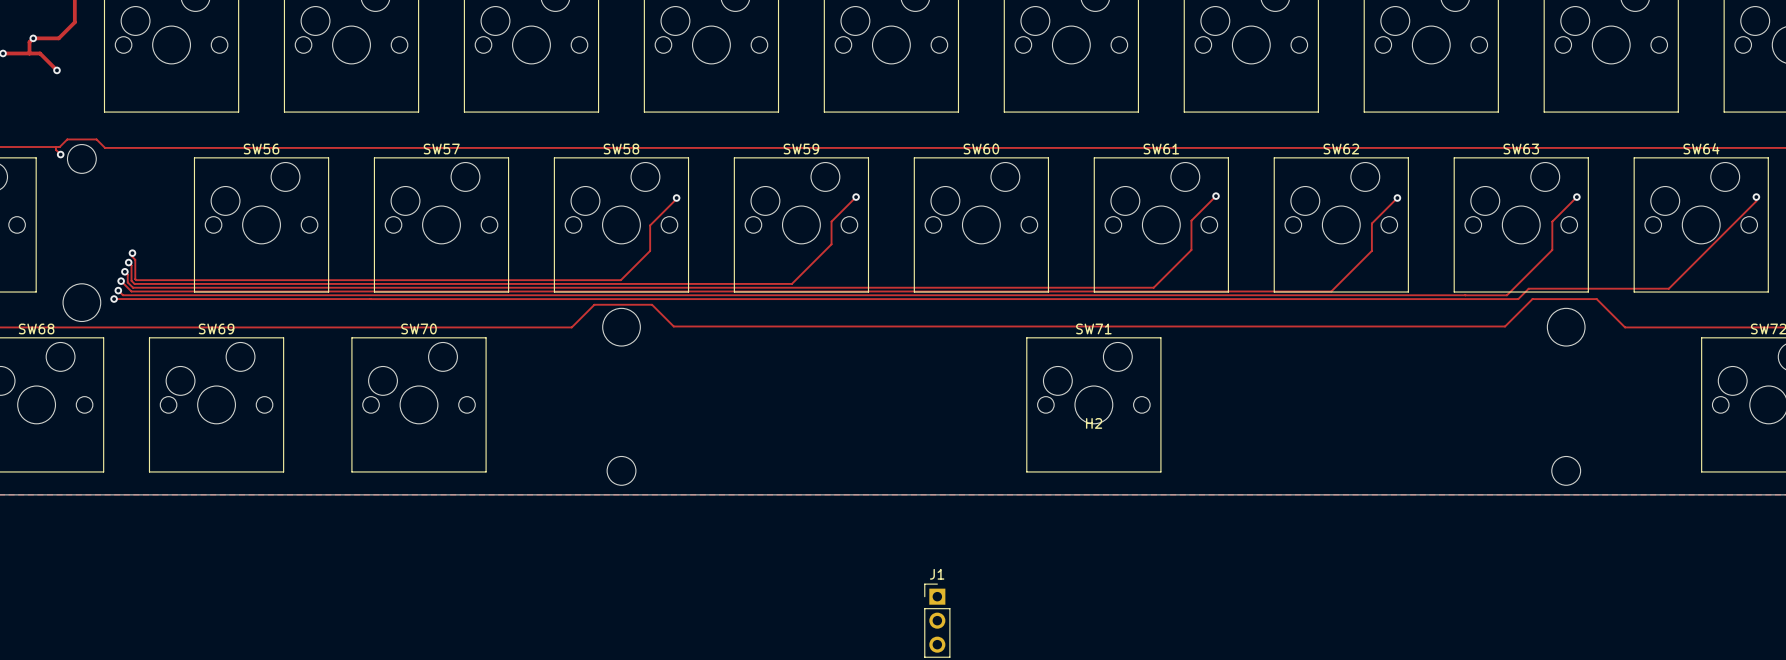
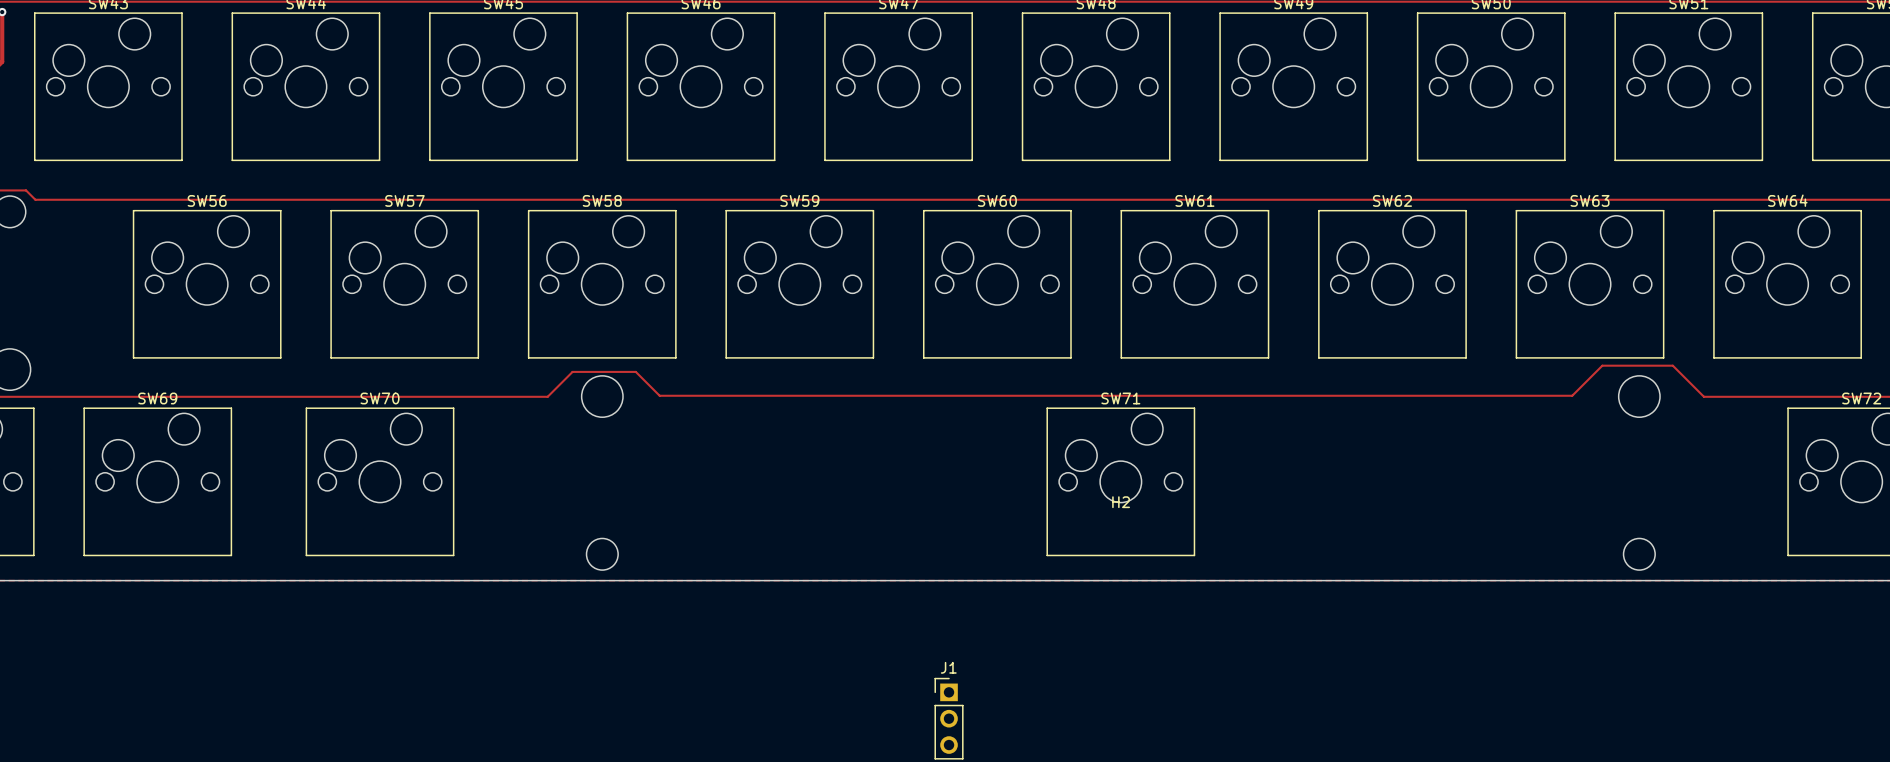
track: (1216, 196) (1191, 220) (1191, 249) (1153, 287) (133, 287) (127, 282) (127, 274) (124, 271) -> none
via: (1216, 196) -> none
track: (856, 197) (831, 221) (831, 244) (791, 283) (134, 283) (131, 280) (131, 265) (128, 262) -> none
via: (856, 197) -> none
track: (1576, 197) (1552, 221) (1552, 249) (1506, 295) (1465, 295) -> none
via: (1576, 197) -> none
track: (1756, 197) (1756, 201) (1668, 288) (1528, 288) (1518, 299) (370, 299) -> none
via: (1756, 197) -> none
track: (676, 198) (650, 225) (650, 250) (620, 280) (136, 280) (135, 259) (132, 253) -> none
via: (676, 198) -> none
track: (1397, 198) (1371, 223) (1371, 250) (1331, 291) (131, 291) (121, 281) -> none
via: (1397, 198) -> none
via: (132, 253) -> none
via: (128, 262) -> none
via: (124, 271) -> none
via: (121, 281) -> none
track: (118, 290) (122, 295) (1465, 295) -> none
via: (118, 290) -> none
track: (114, 299) (370, 299) -> none
via: (114, 299) -> none

